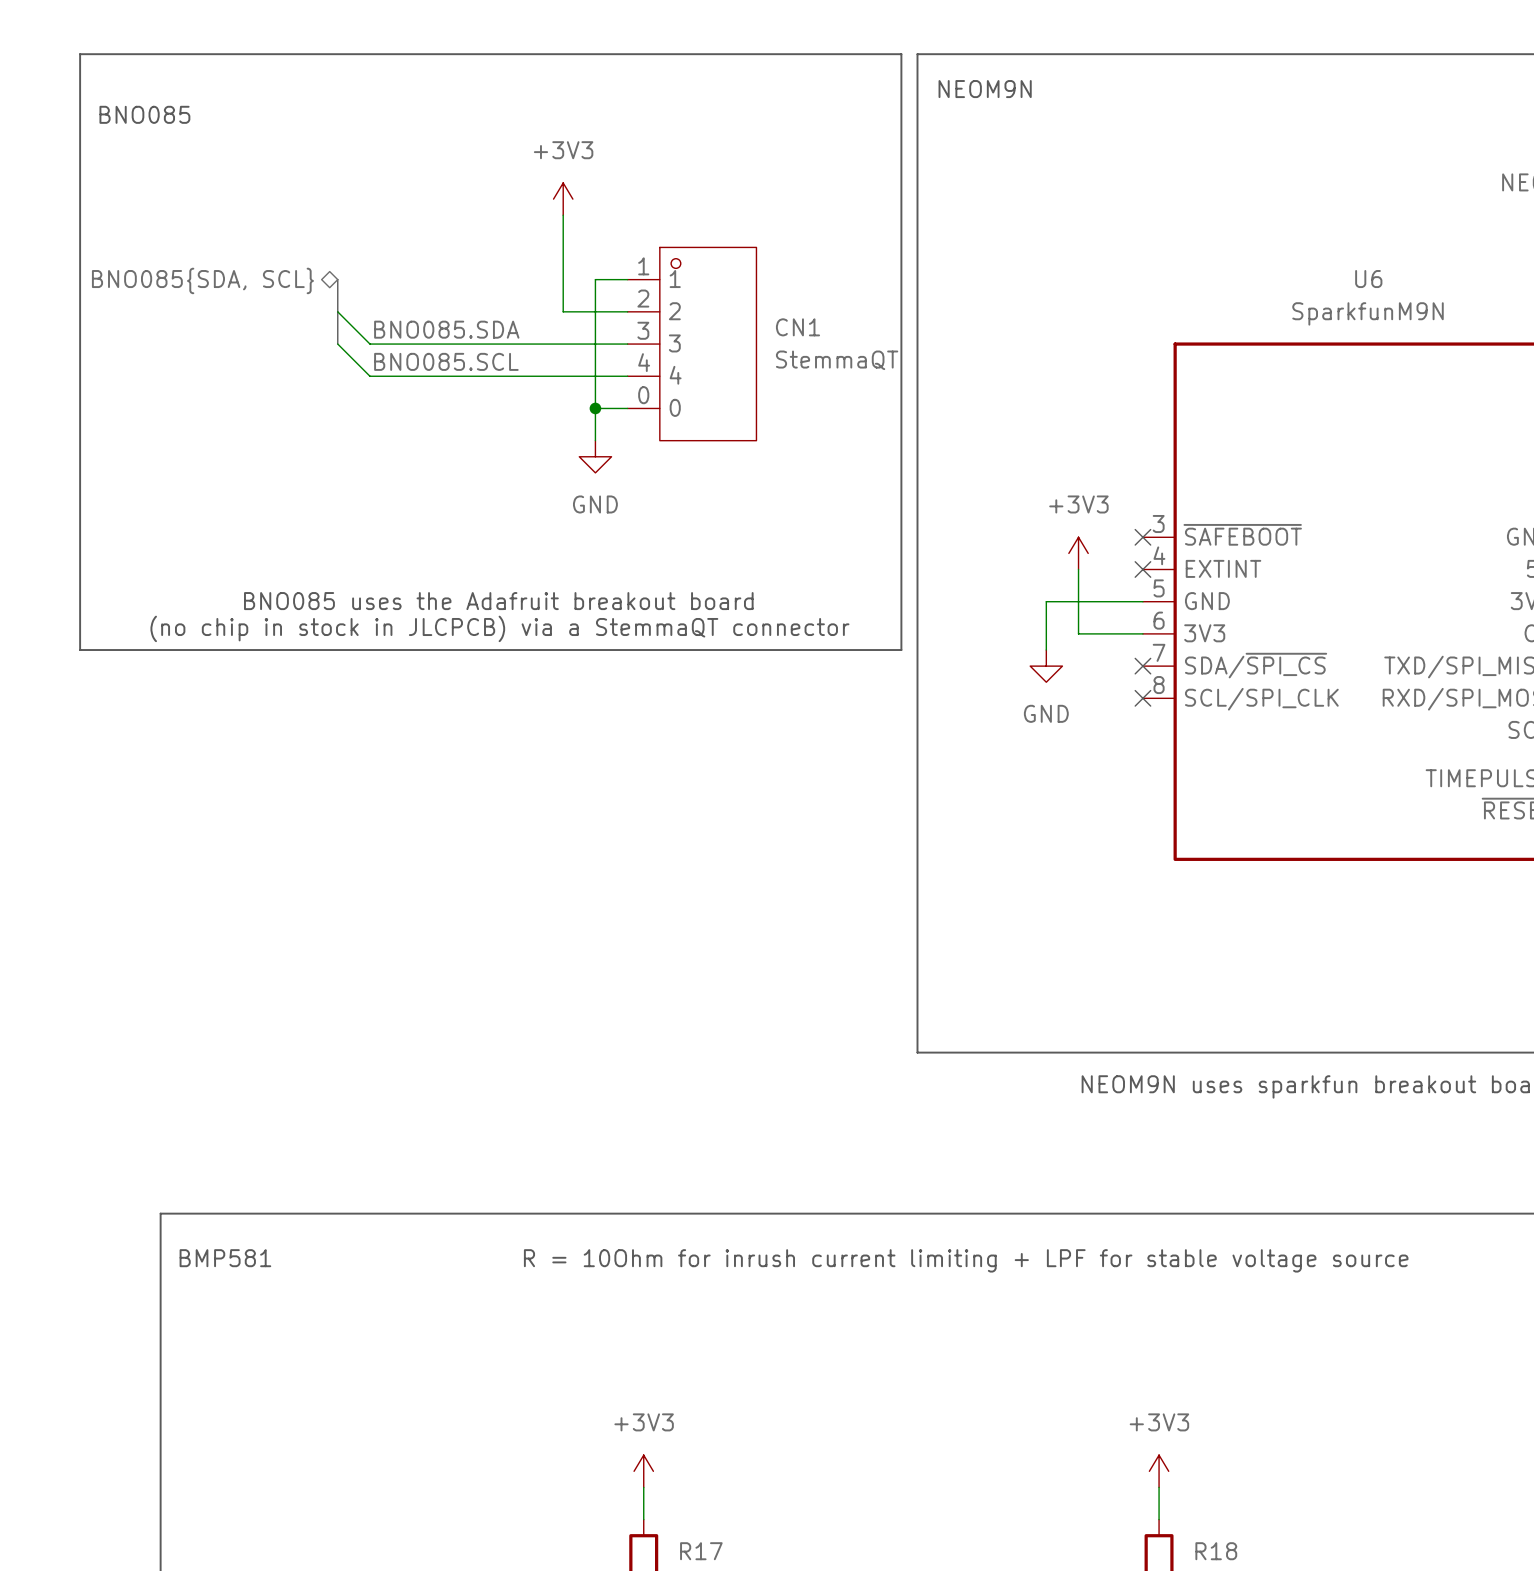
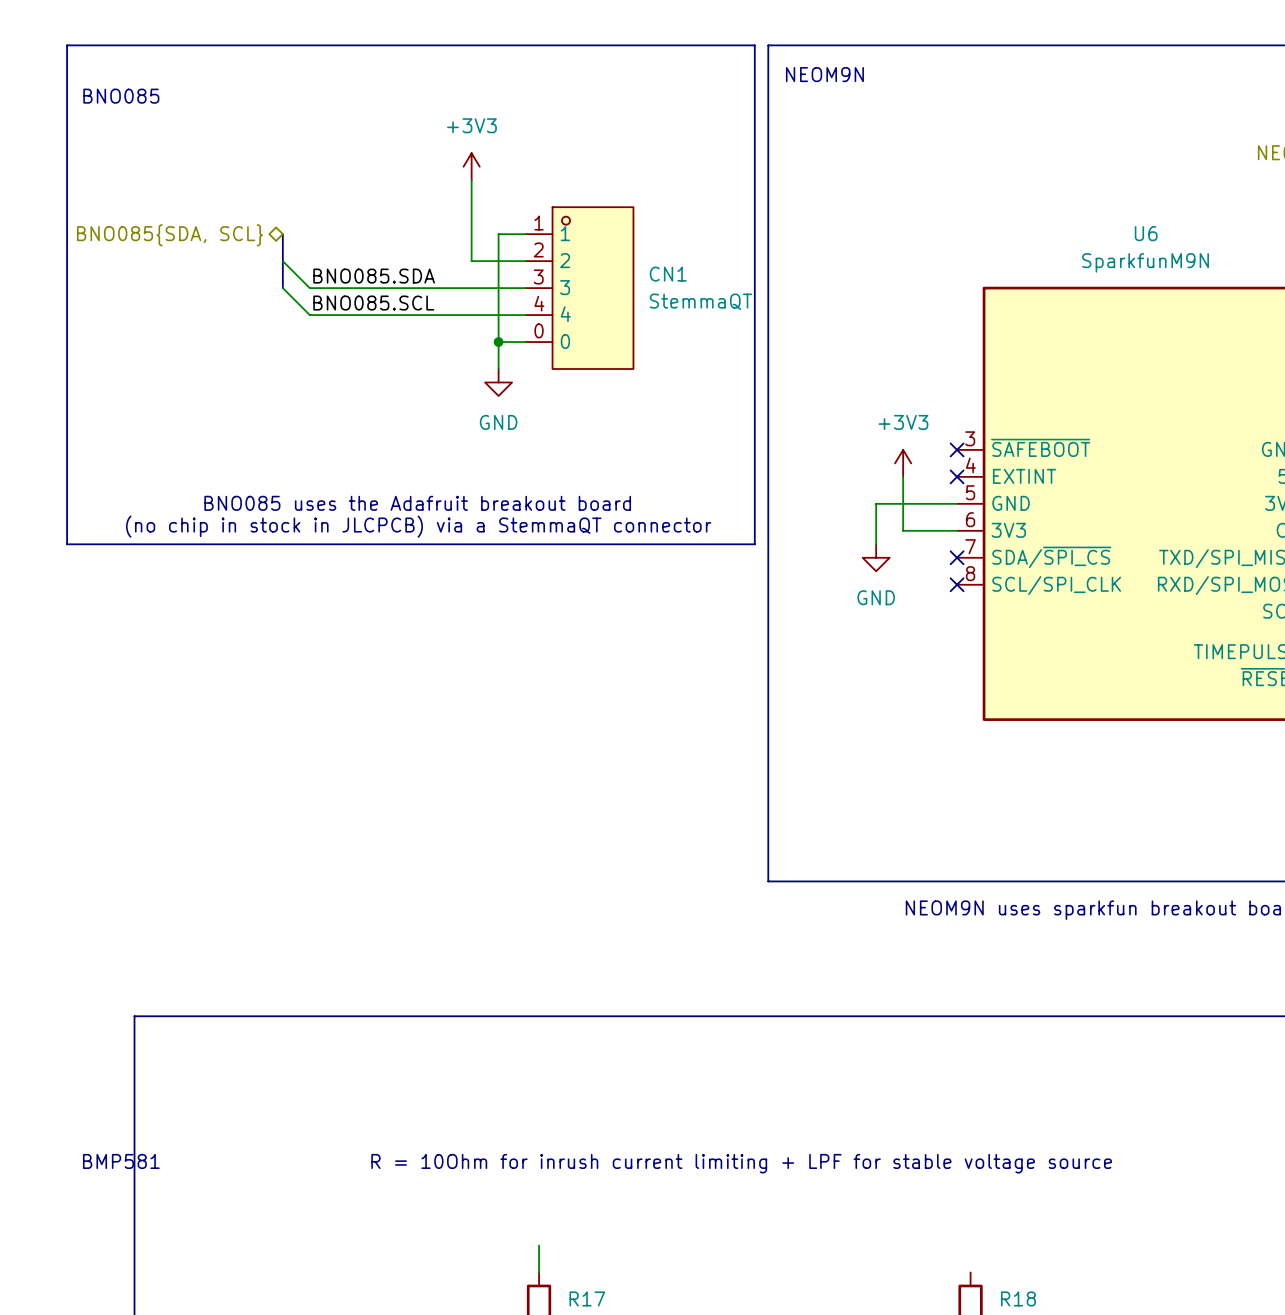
text position: BMP581 (225, 1258) -> BMP581 (121, 1161)
text position: R = 10Ohm for inrush current limiting + LPF for stable voltage source (966, 1260) -> R = 10Ohm for inrush current limiting + LPF for stable voltage source (741, 1163)
power symbol: +3V3 (643, 1471) -> none
power symbol: +3V3 (1159, 1471) -> none
wire: (1159, 1487) (1159, 1519) -> none

